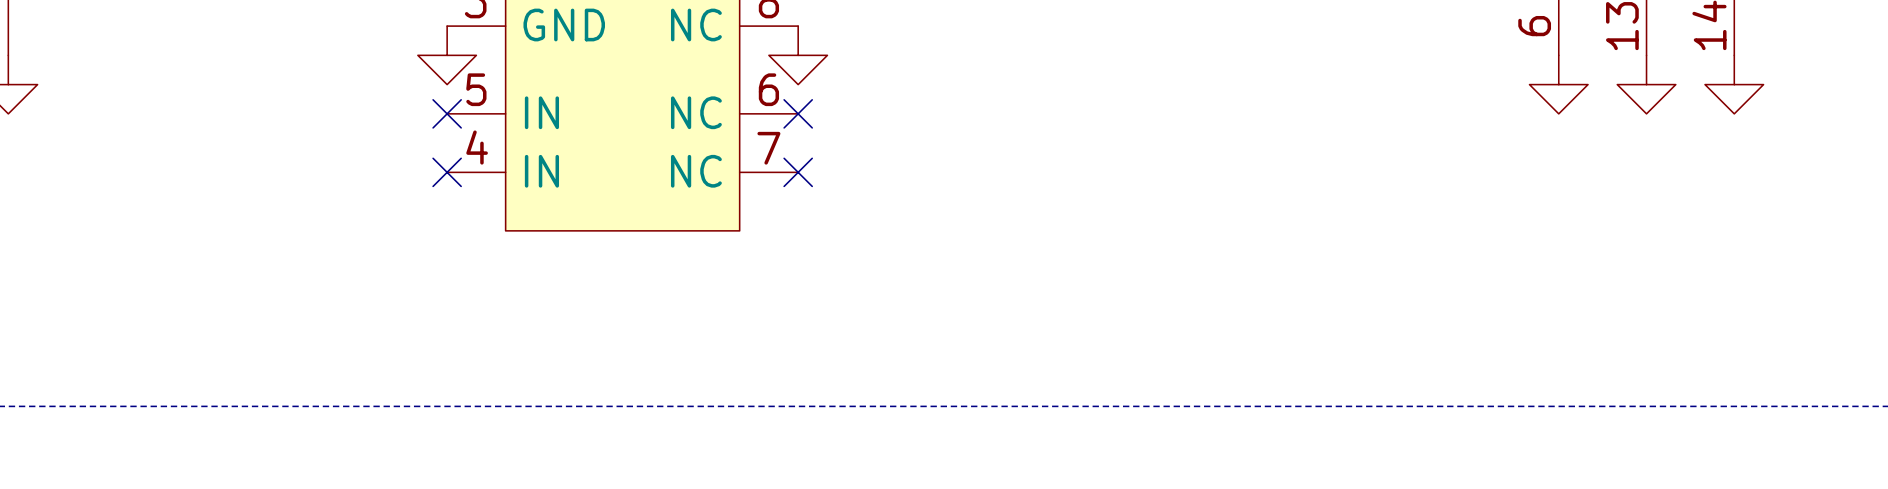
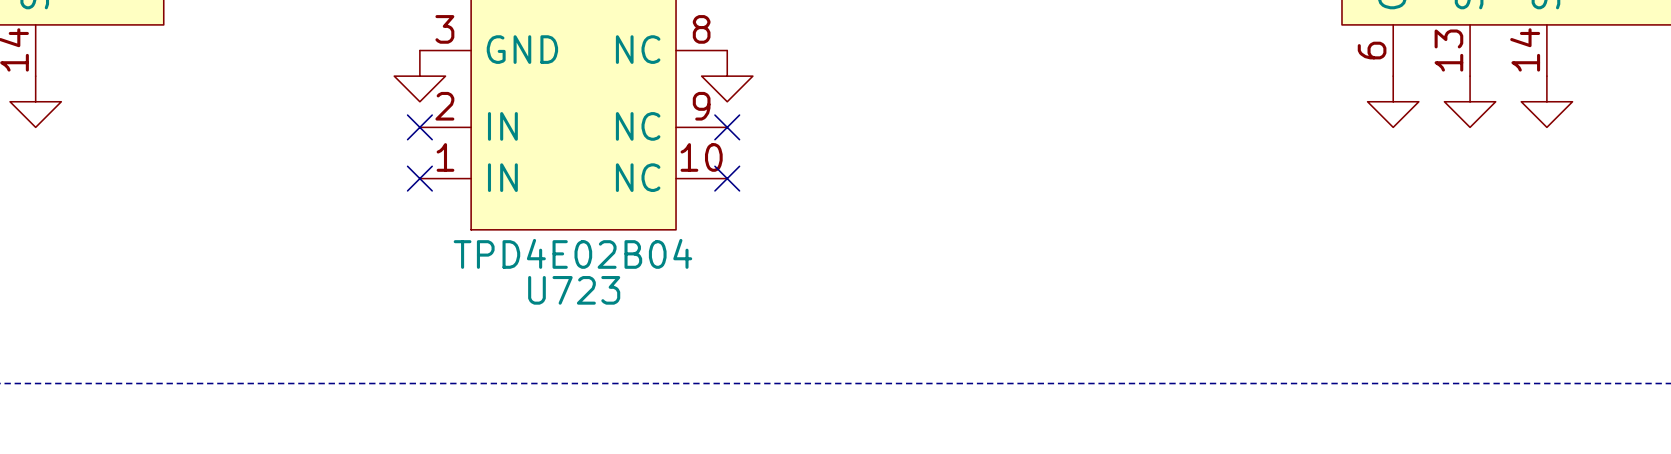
U723 pin number: 5 (476, 89) -> 2 (444, 106)
U723 pin number: 6 (768, 89) -> 9 (701, 106)
U723 pin number: 4 (477, 147) -> 1 (445, 157)
U723 pin number: 7 (768, 148) -> 10 (701, 157)
U723 value: none -> TPD4E02B04 (572, 253)
U723 name: none -> U723 (574, 290)

